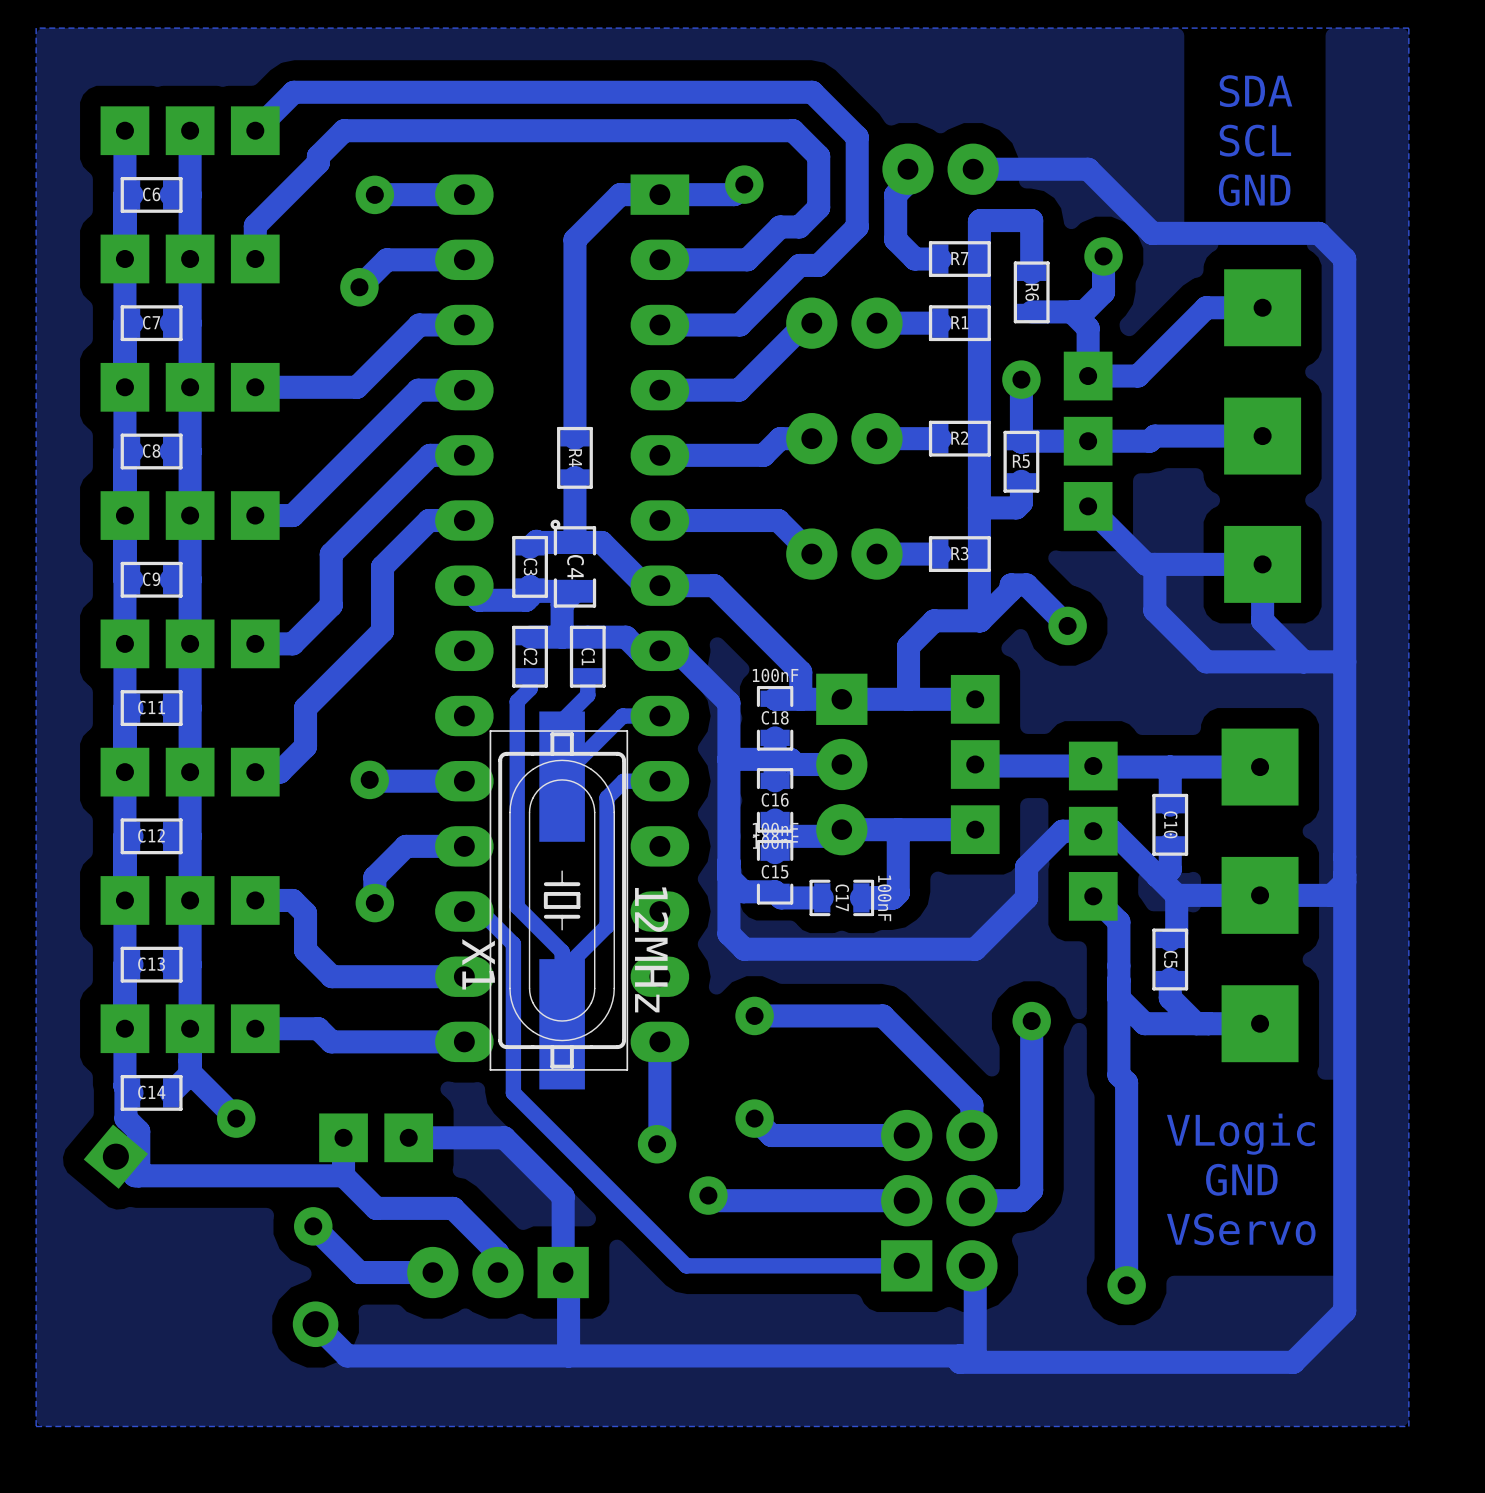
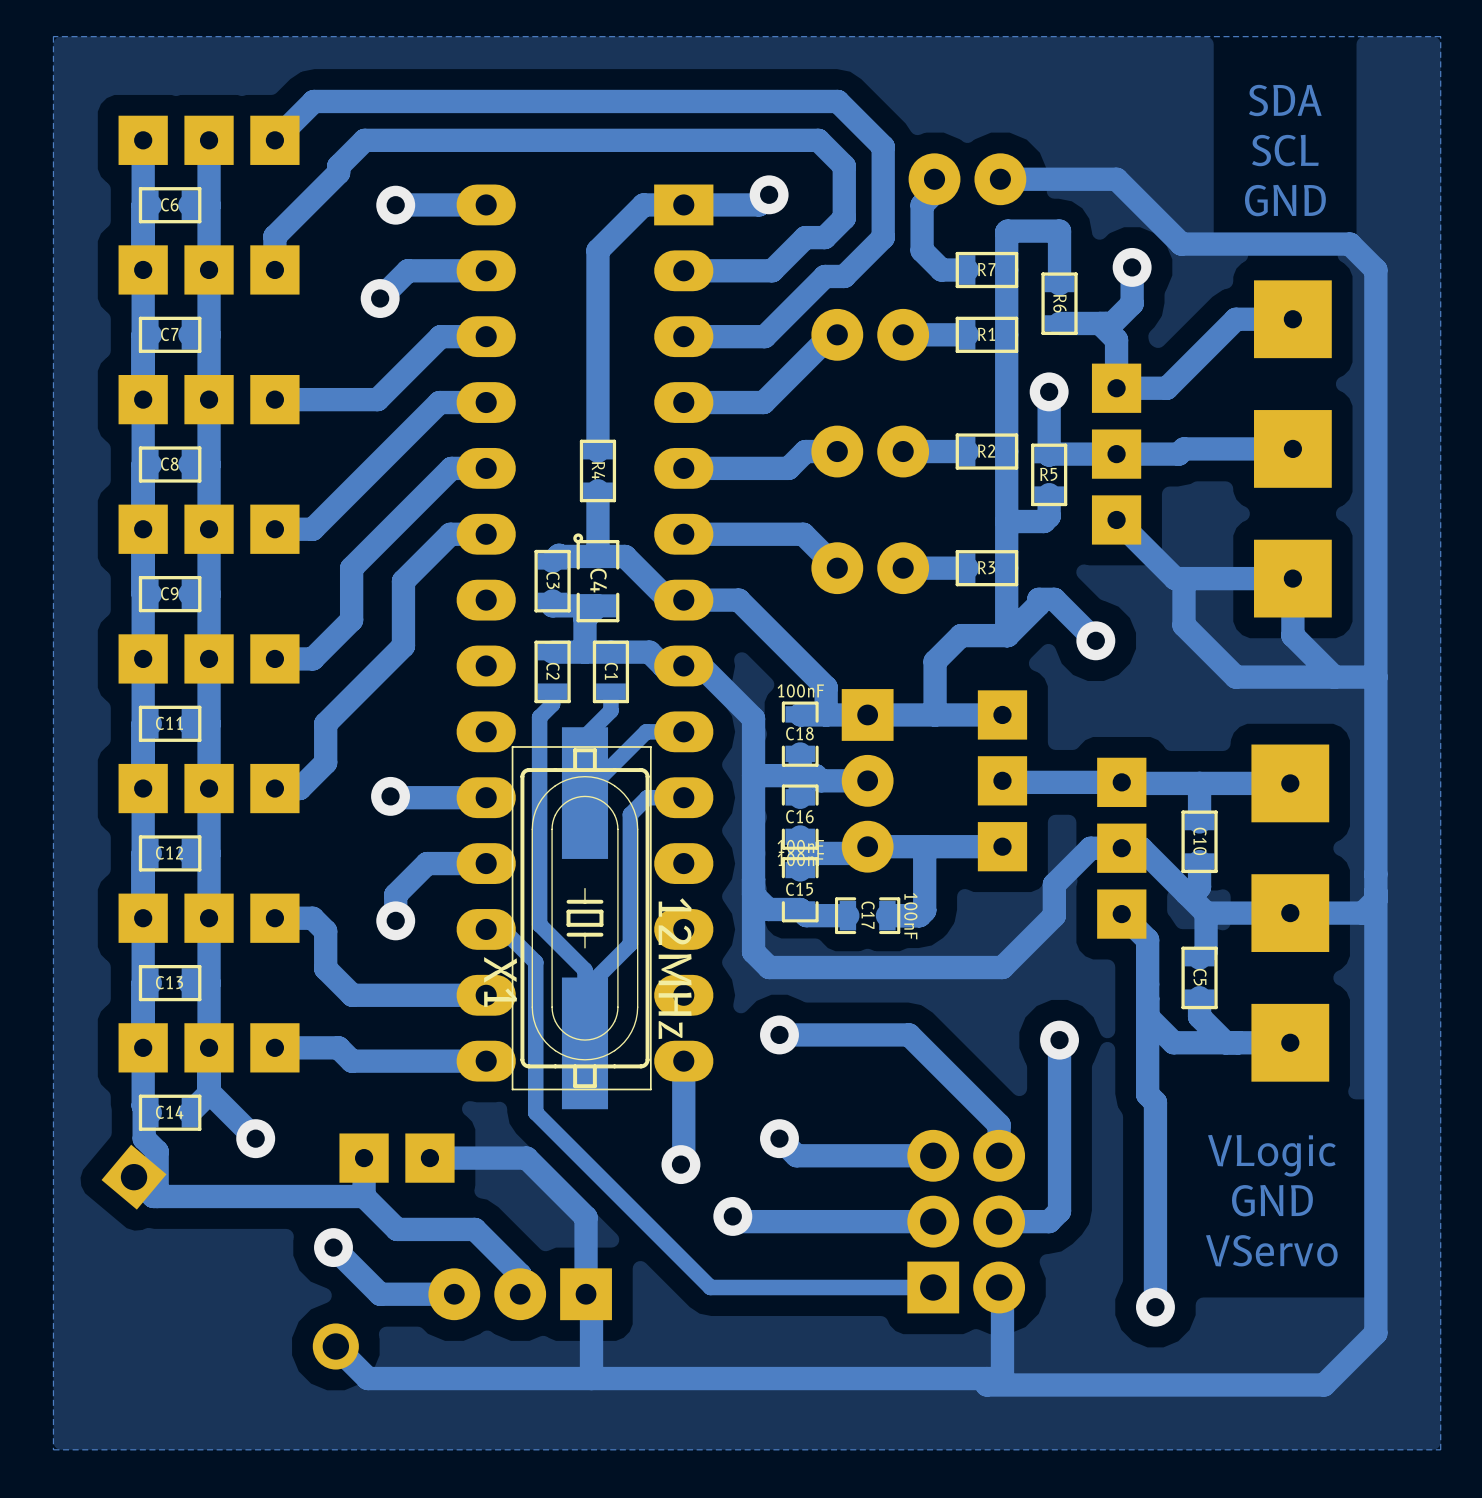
track: (464, 585) (478, 600) (526, 600) (530, 596) (530, 591) -> none

